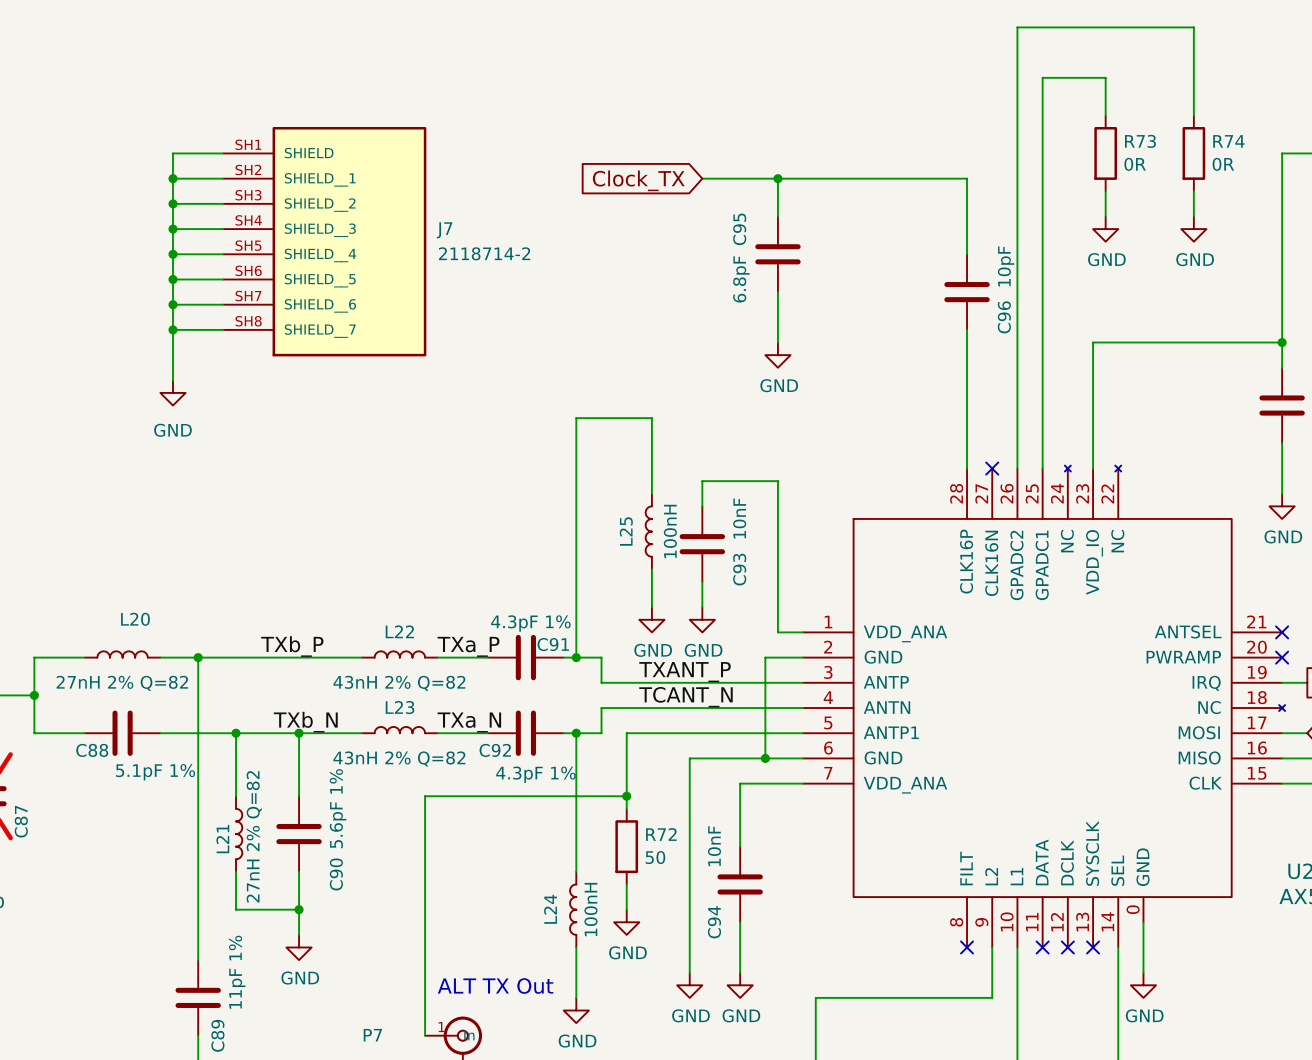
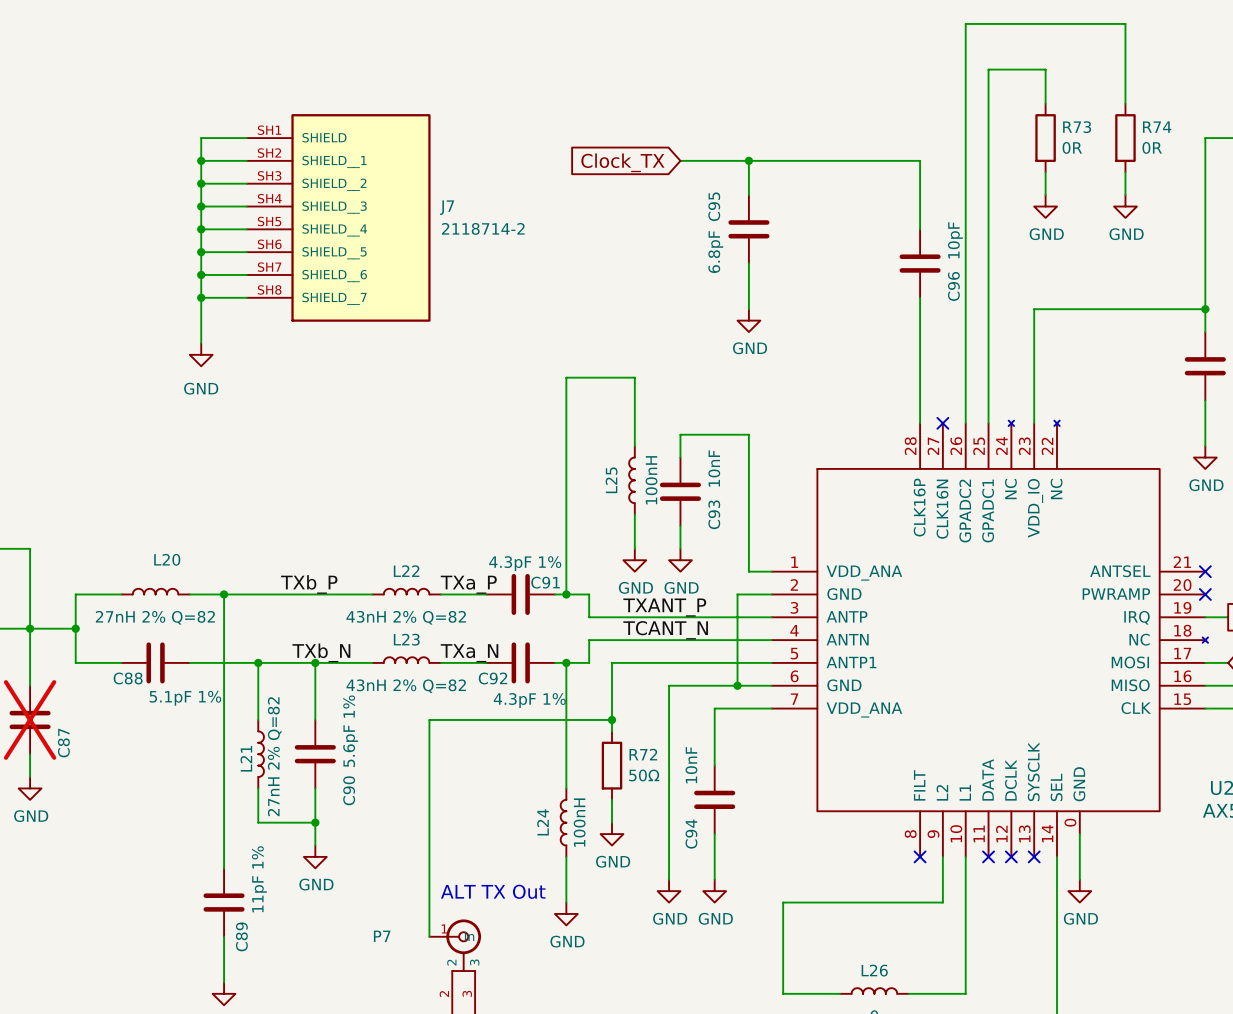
R72 value: 50 (655, 857) -> 50Ω (644, 775)

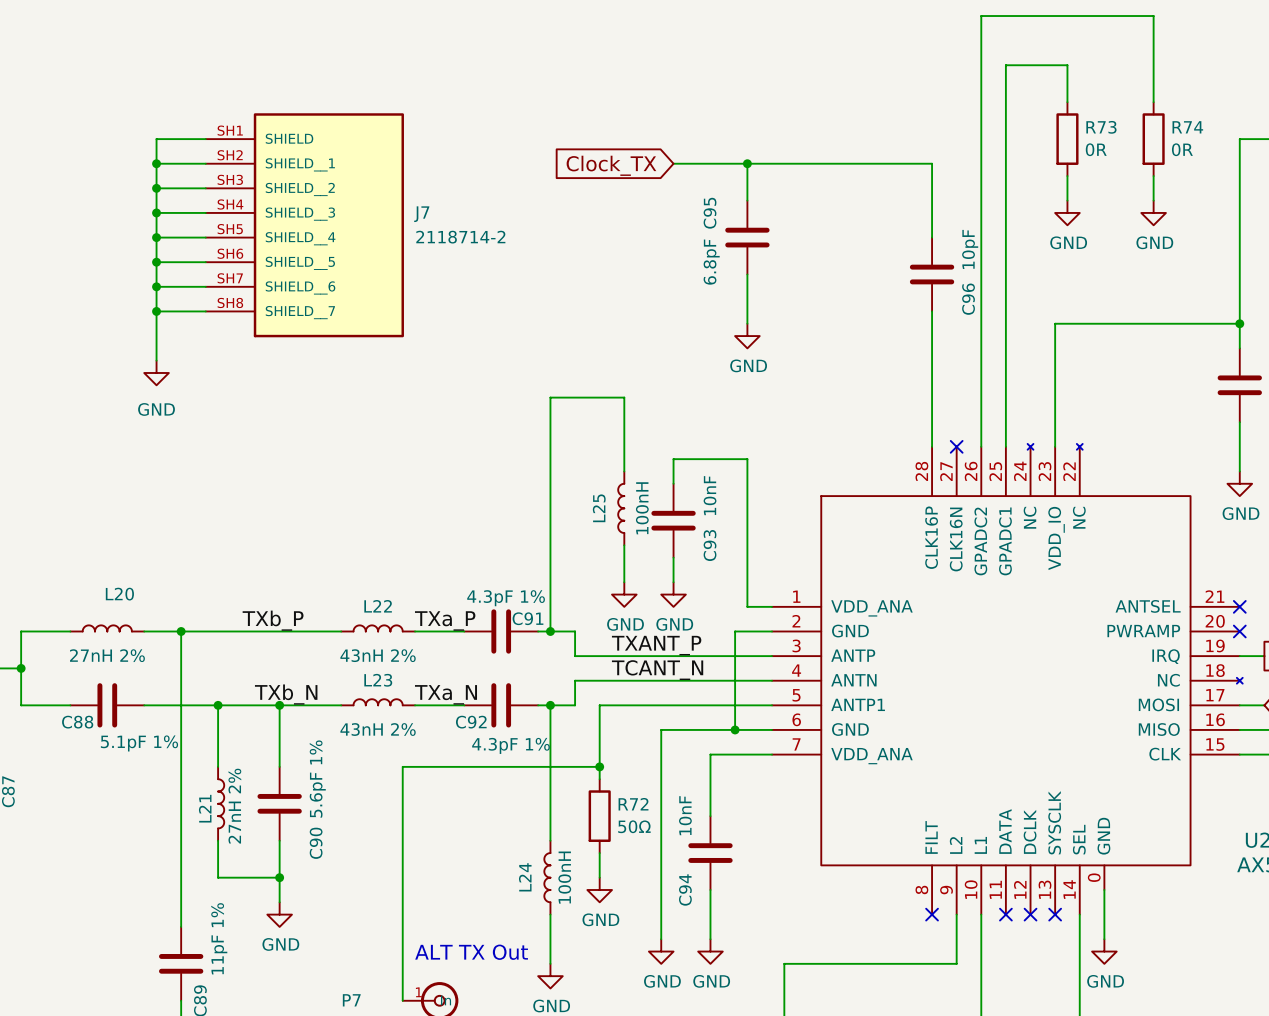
L20 value: 27nH 2% Q=82 (155, 617) -> 27nH 2% (107, 655)
L22 value: 43nH 2% Q=82 (406, 617) -> 43nH 2% (378, 655)
L23 value: 43nH 2% Q=82 (406, 686) -> 43nH 2% (378, 729)
L21 value: 27nH 2% Q=82 (274, 756) -> 27nH 2% (234, 806)

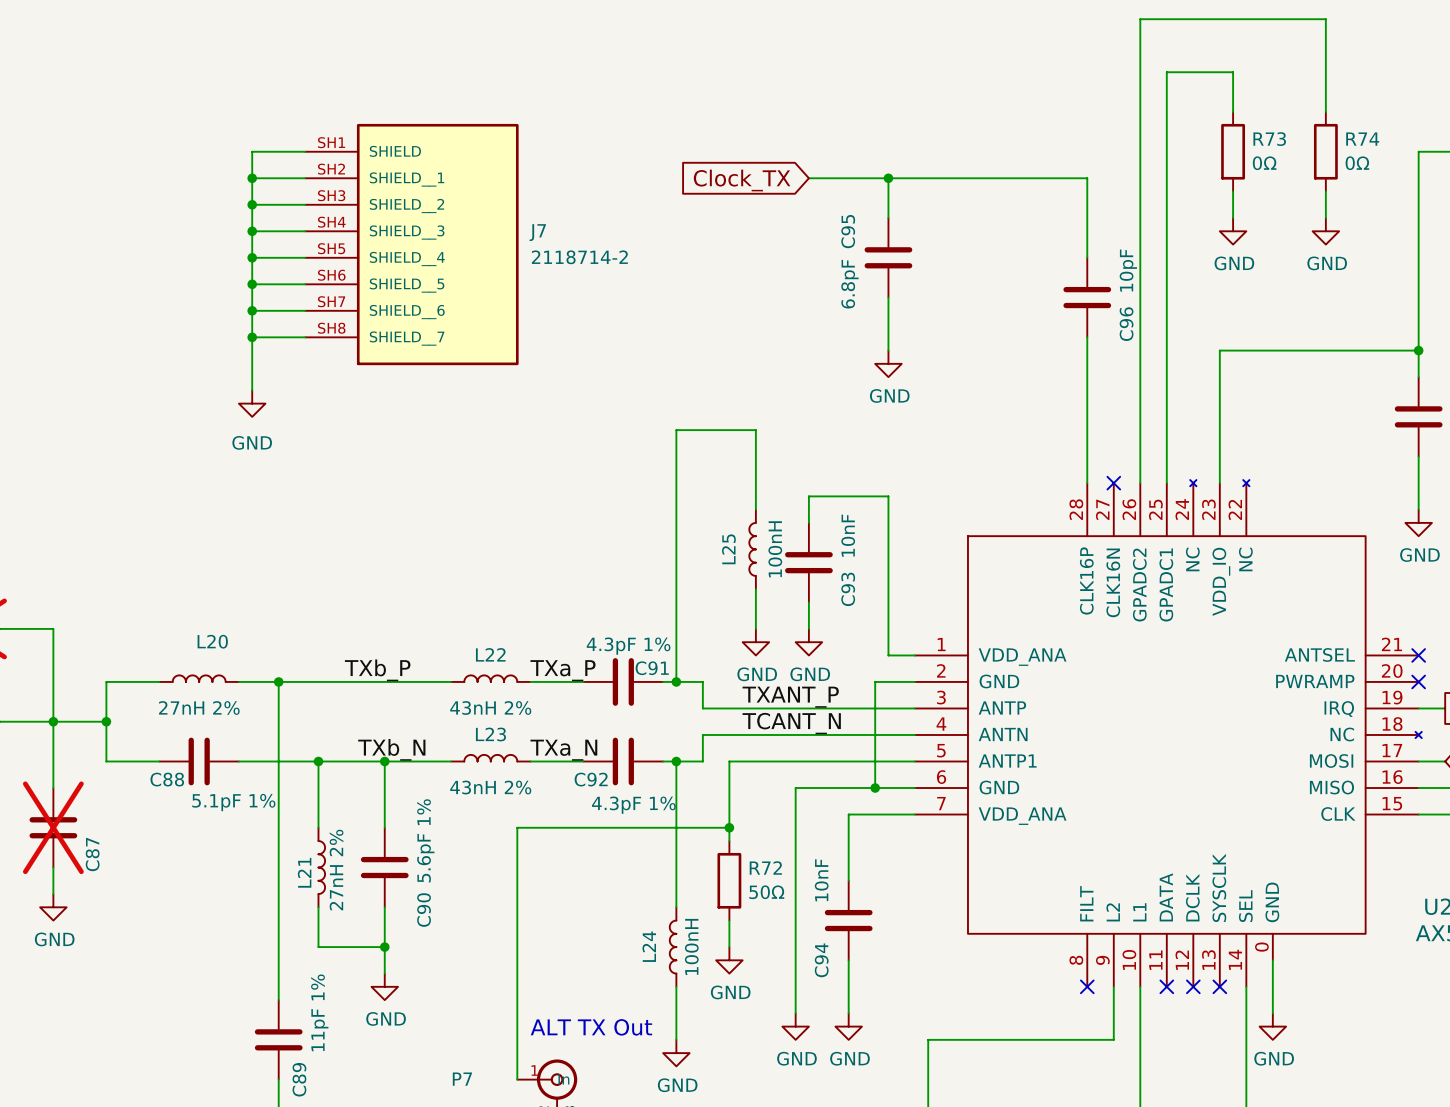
R73 value: 0R (1096, 149) -> 0Ω (1264, 163)
R74 value: 0R (1182, 149) -> 0Ω (1357, 163)

